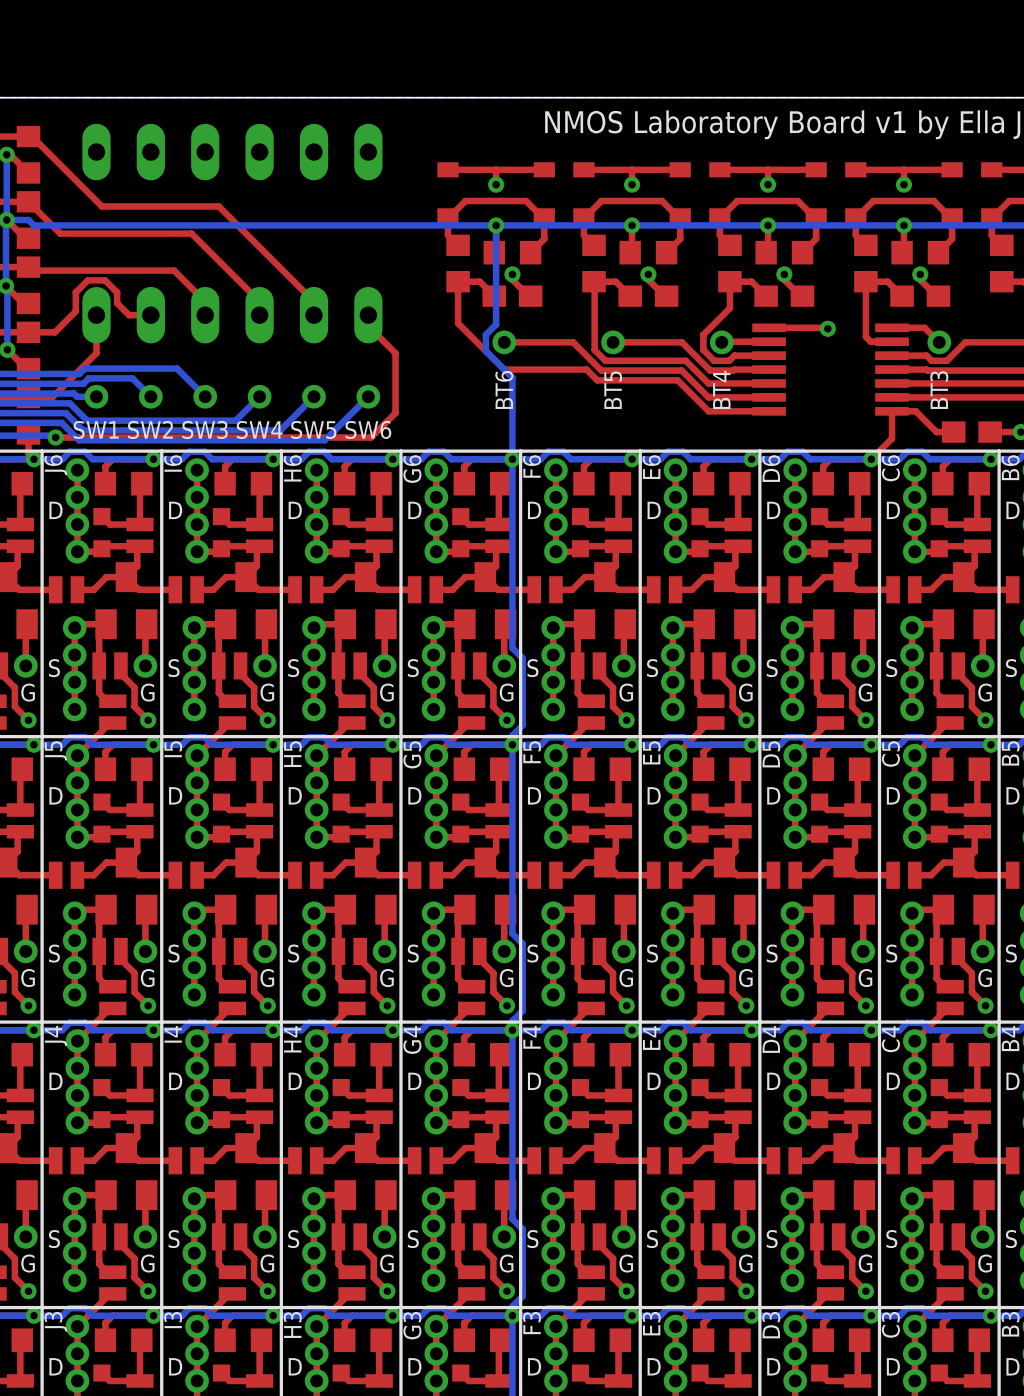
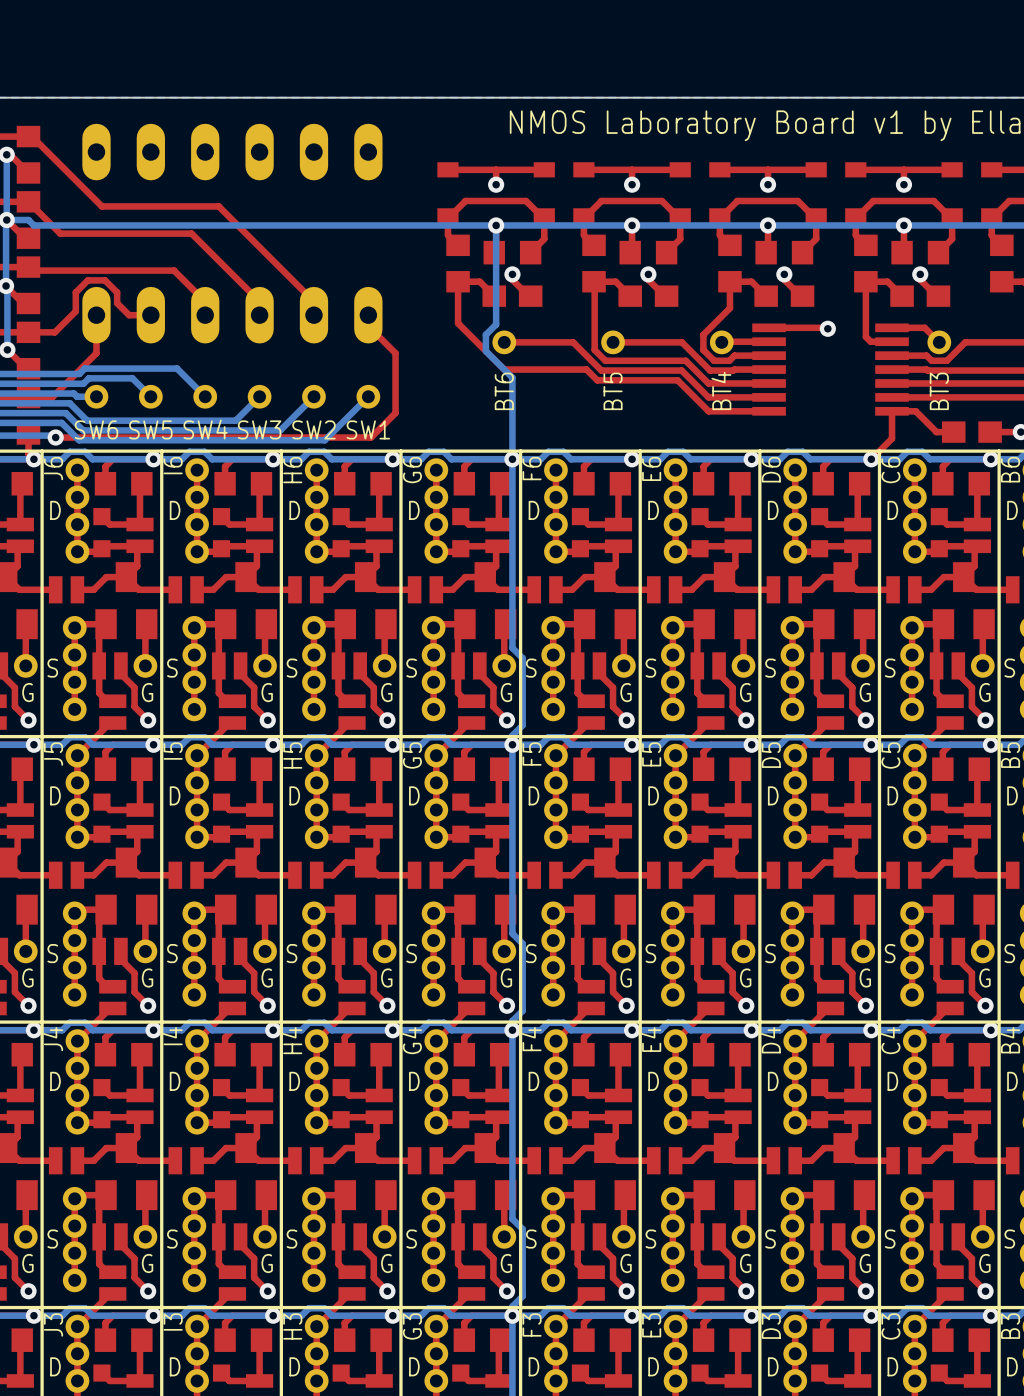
text: SW1 (96, 429) -> SW6 (96, 429)
text: SW2 (150, 429) -> SW5 (150, 429)
text: SW3 (205, 429) -> SW4 (205, 429)
text: SW4 (259, 429) -> SW3 (259, 429)
text: SW5 (313, 429) -> SW2 (313, 429)
text: SW6 (368, 429) -> SW1 (368, 429)

